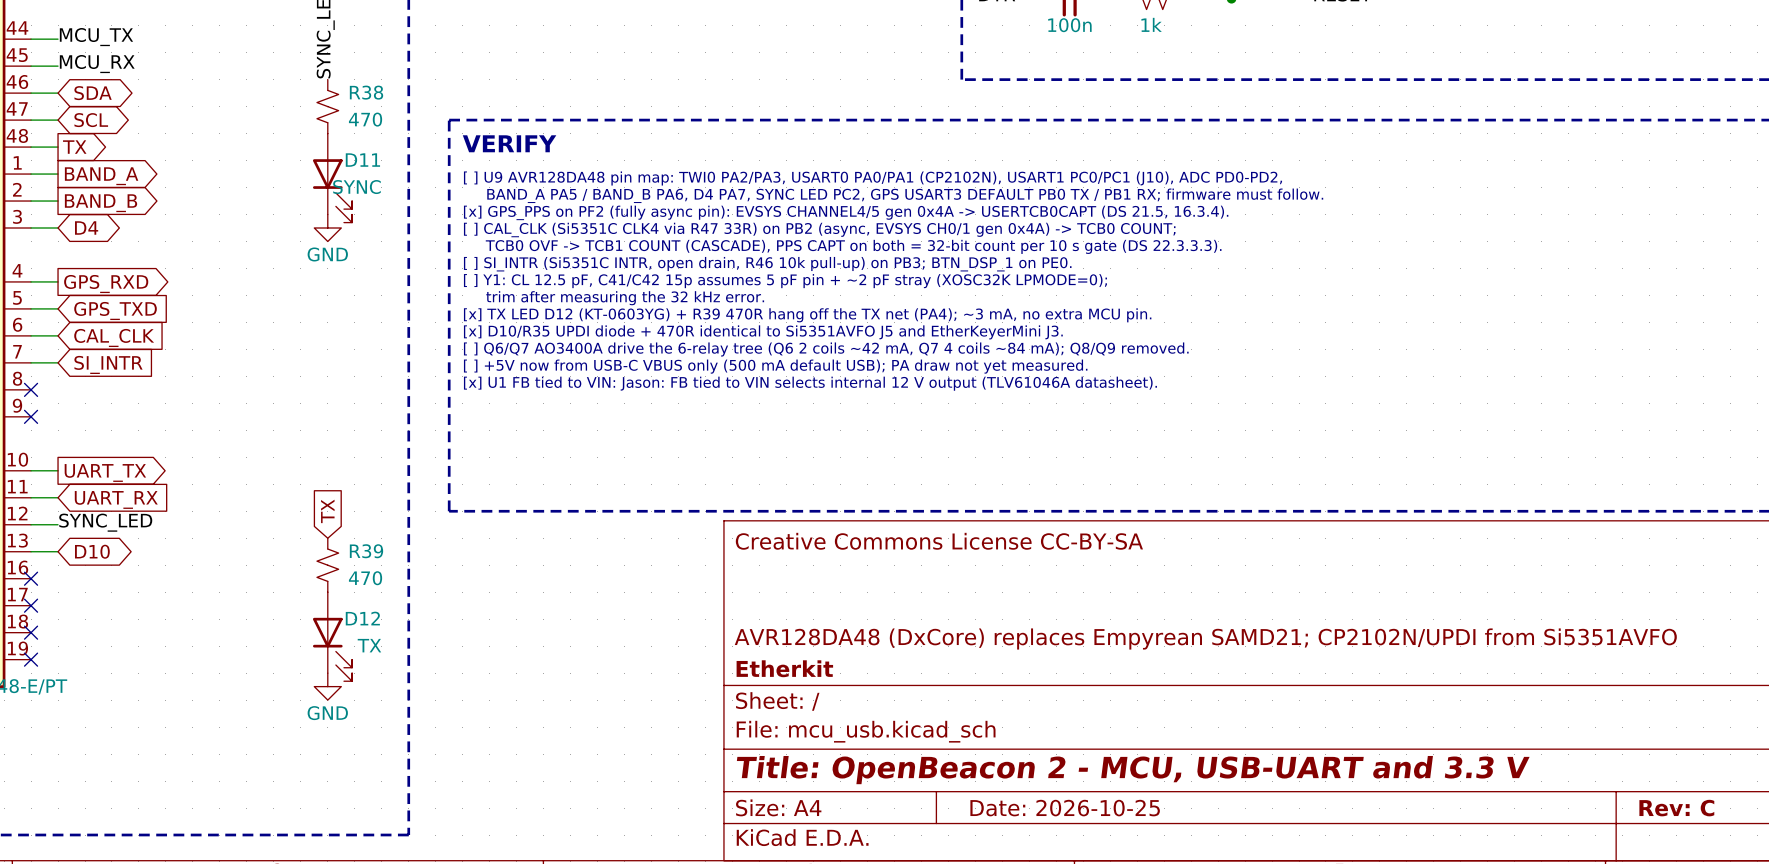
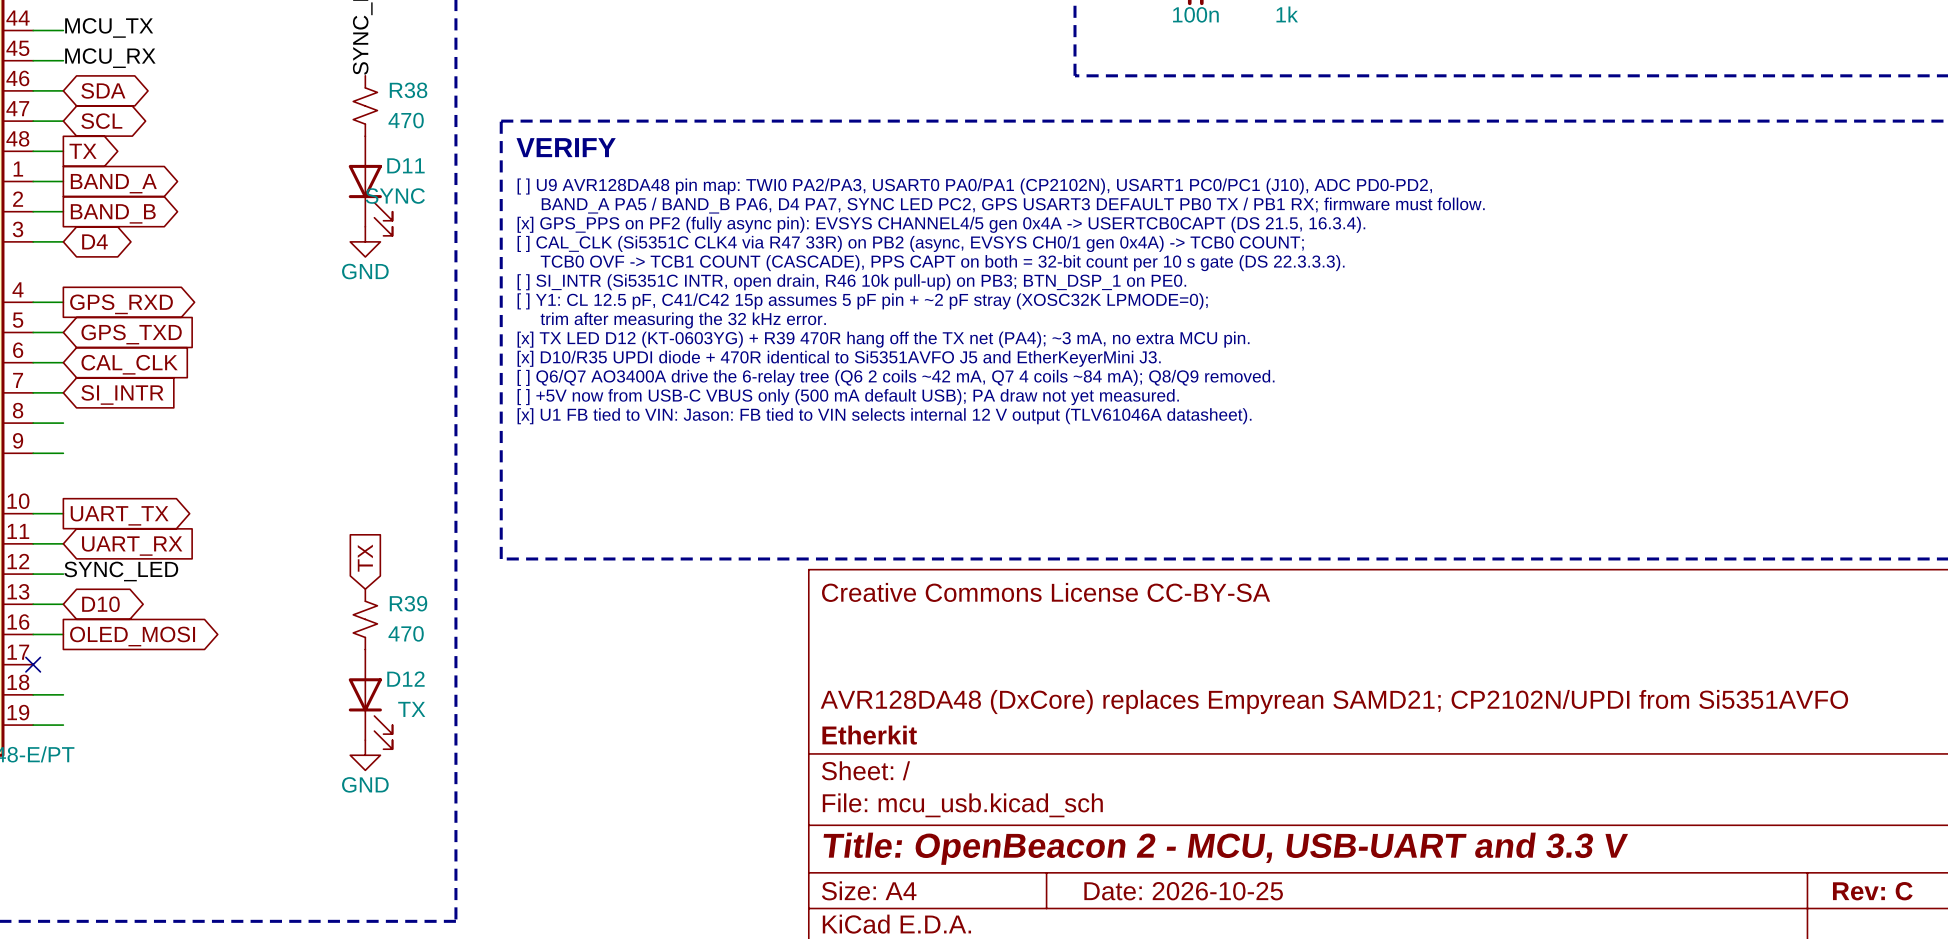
wire: none -> (33, 423) (63, 423)
no-connect mark: (31, 389) -> none
wire: none -> (33, 453) (63, 453)
no-connect mark: (31, 416) -> none
wire: none -> (33, 634) (63, 634)
no-connect mark: (31, 578) -> none
global label: none -> OLED_MOSI (132, 636)
wire: none -> (33, 694) (63, 694)
no-connect mark: (31, 632) -> none
wire: none -> (33, 725) (63, 725)
no-connect mark: (31, 659) -> none

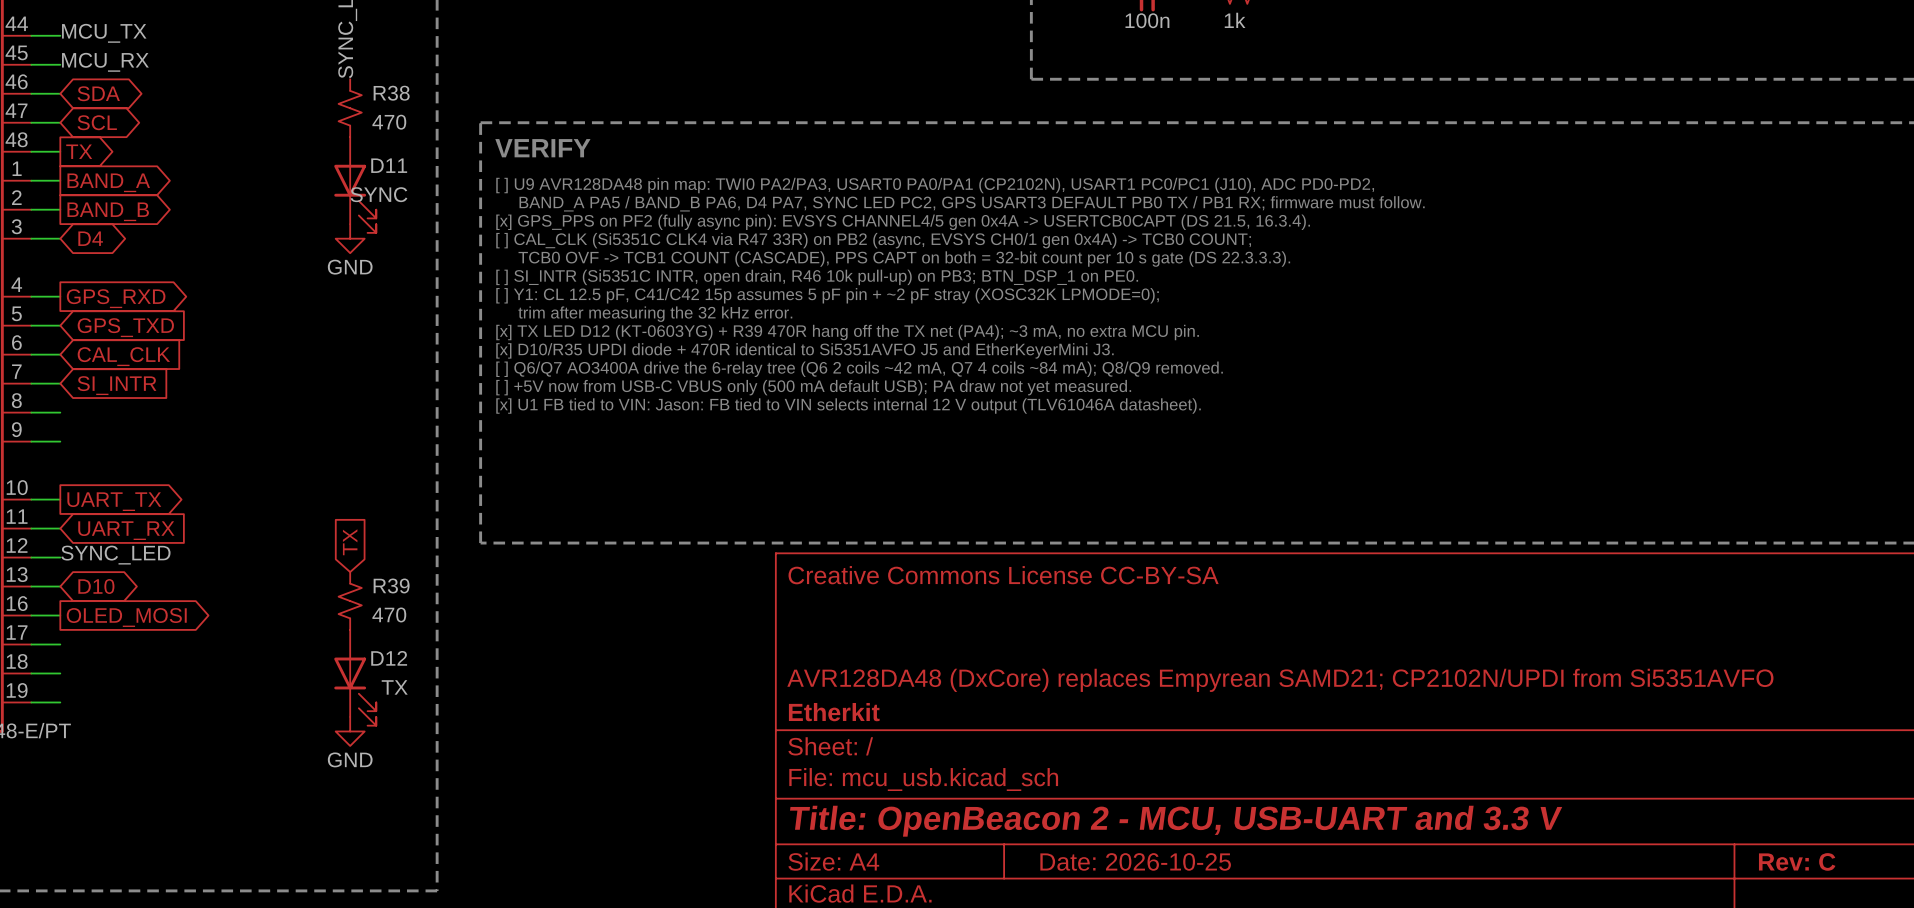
wire: none -> (31, 644) (60, 644)
no-connect mark: (33, 664) -> none

